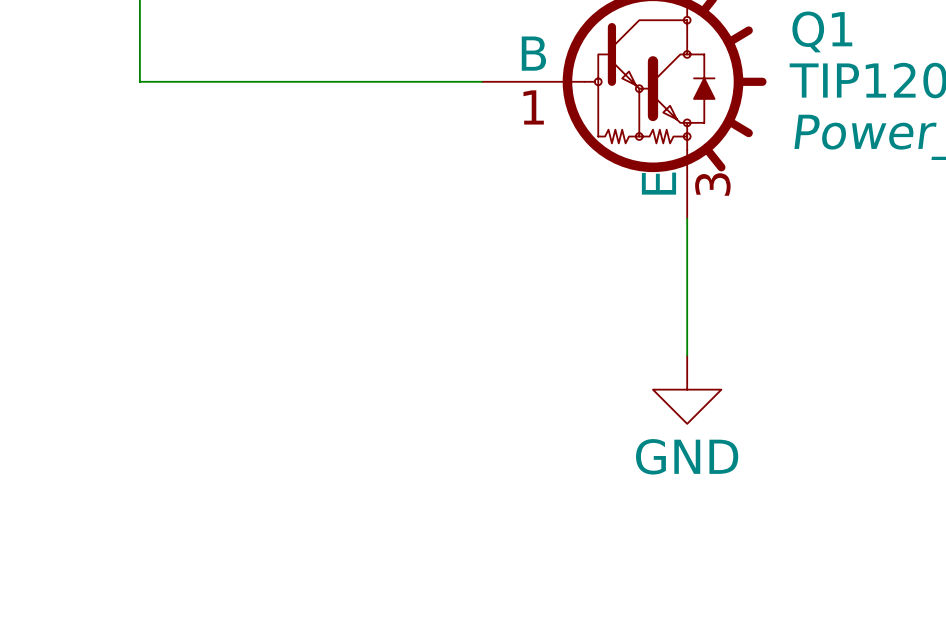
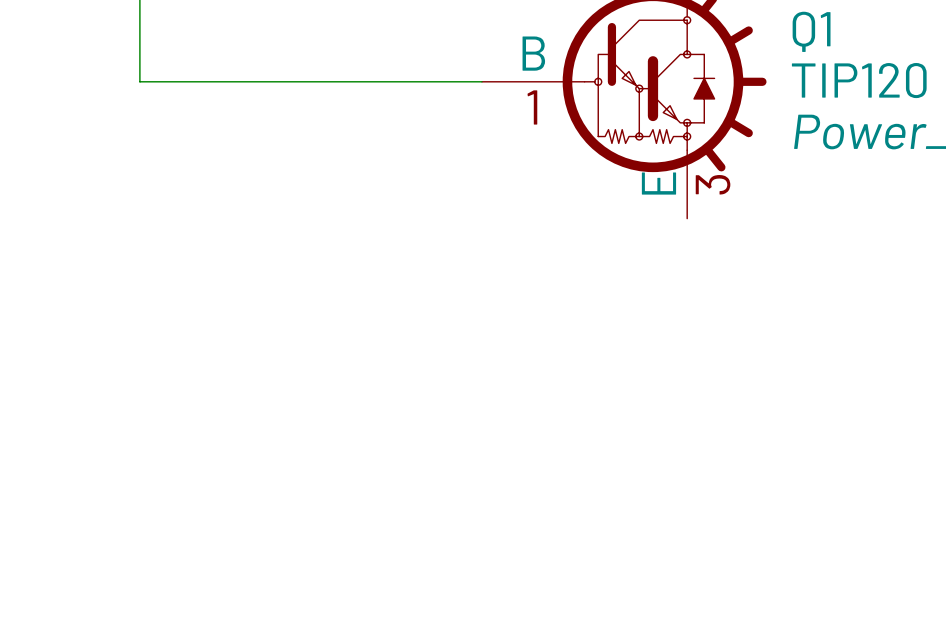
wire: (687, 218) (687, 355) -> none
power symbol: GND (687, 389) -> none

